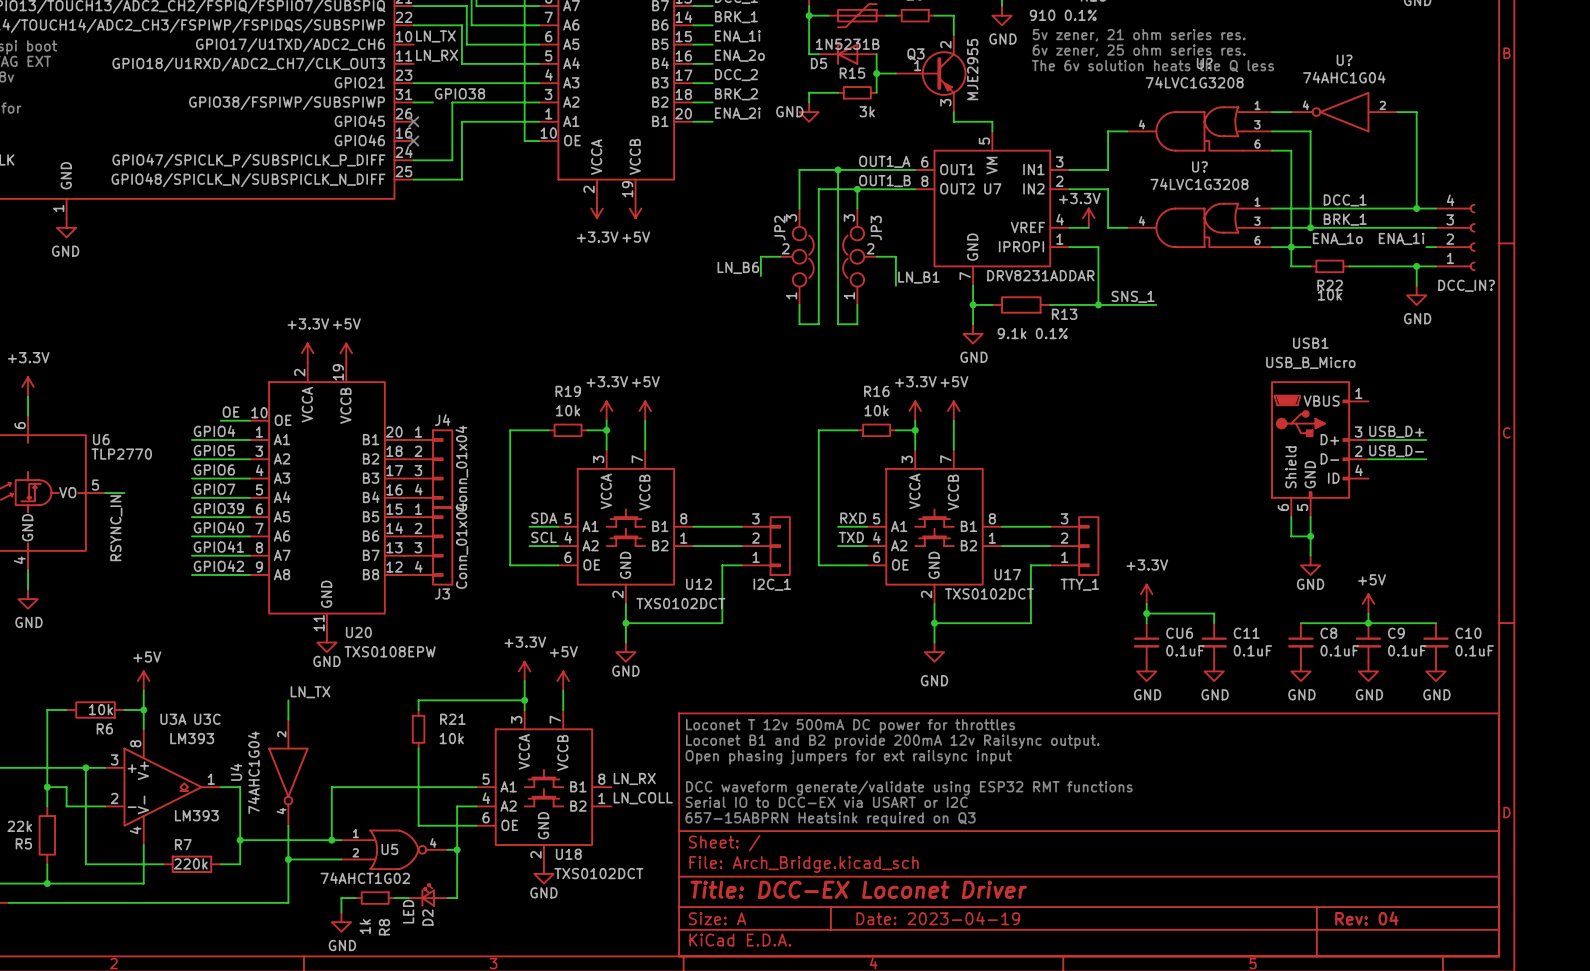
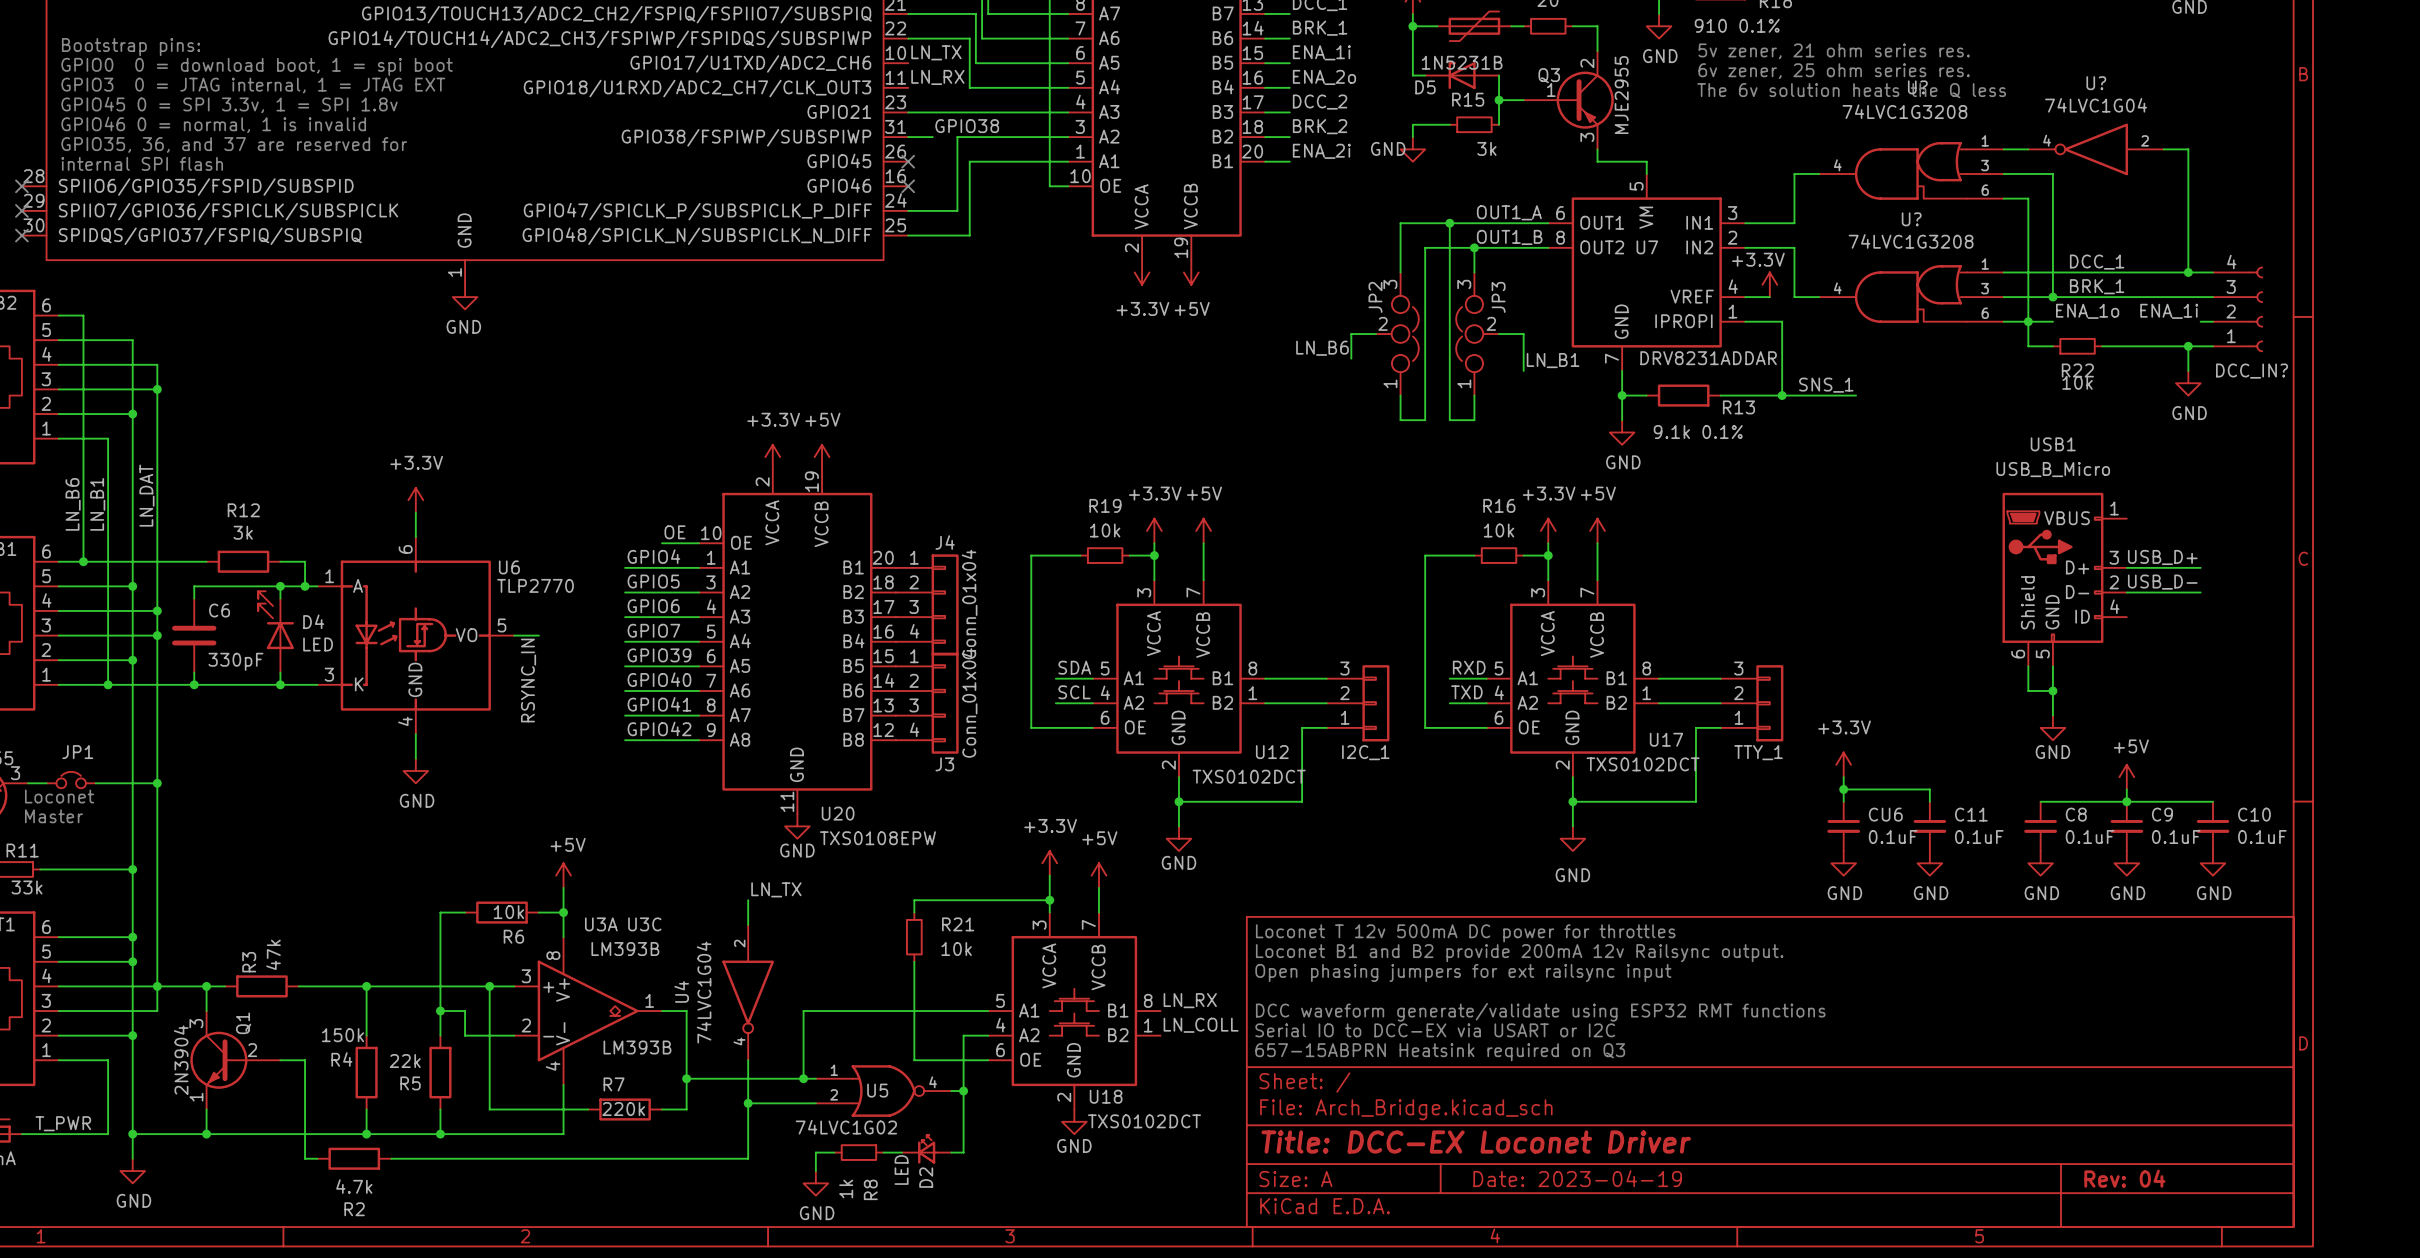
U? value: 74AHC1G04 (1344, 77) -> 74LVC1G04 (2096, 105)
U3A value: LM393 (192, 738) -> LM393B (625, 949)
U4 value: 74AHC1G04 (253, 772) -> 74LVC1G04 (704, 992)
U3C value: LM393 (196, 815) -> LM393B (637, 1047)
U5 value: 74AHCT1G02 (365, 878) -> 74LVC1G02 (846, 1127)

